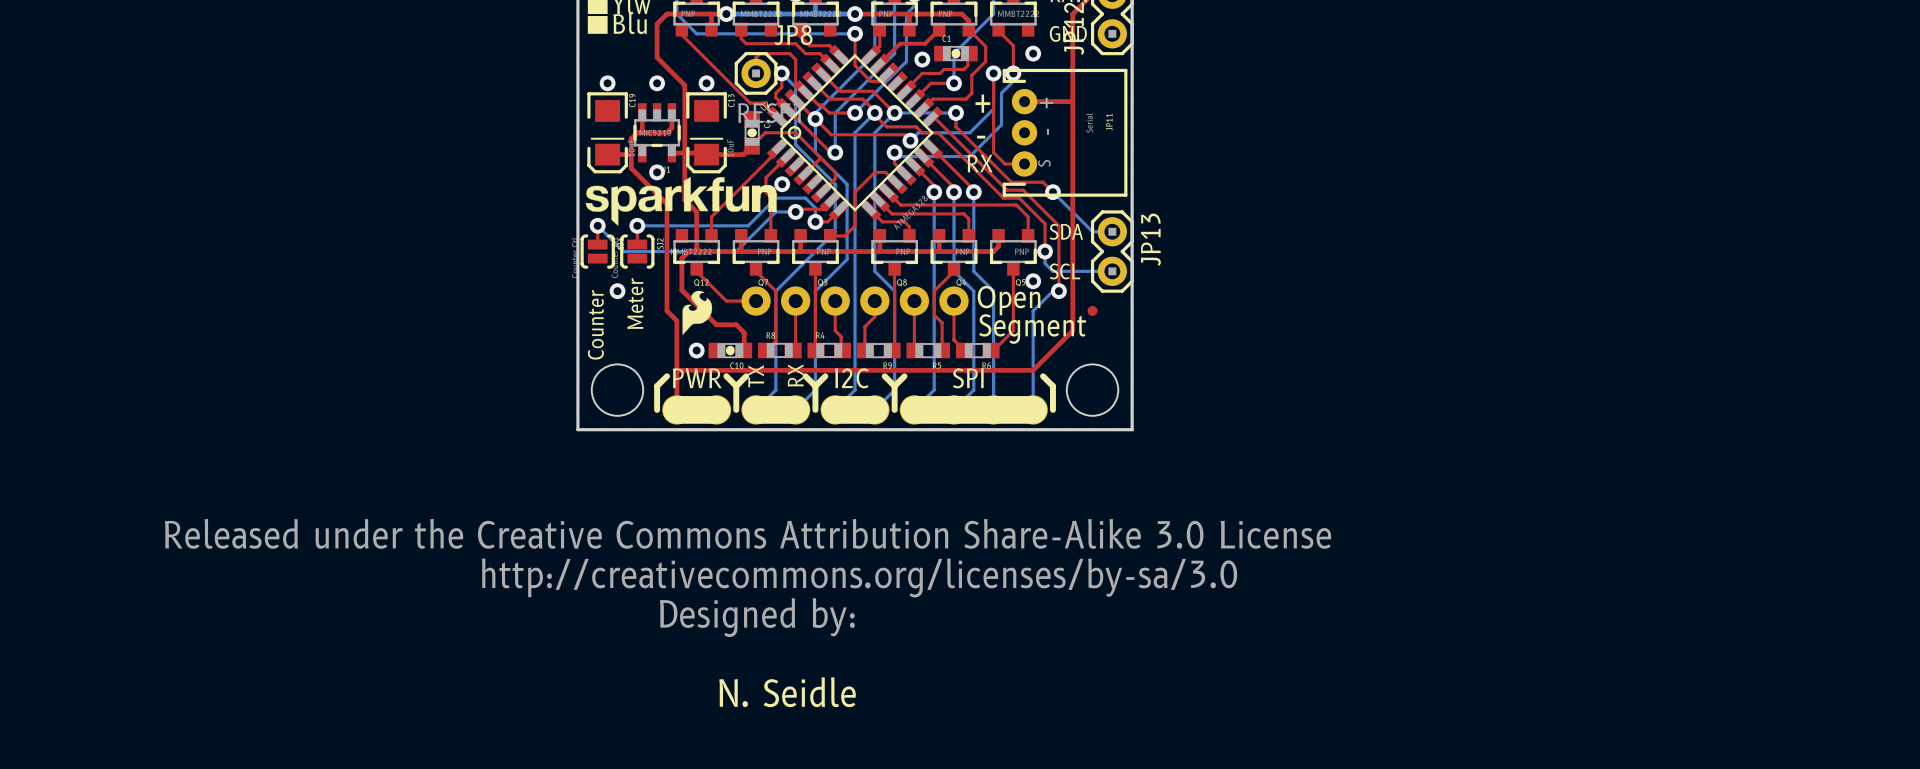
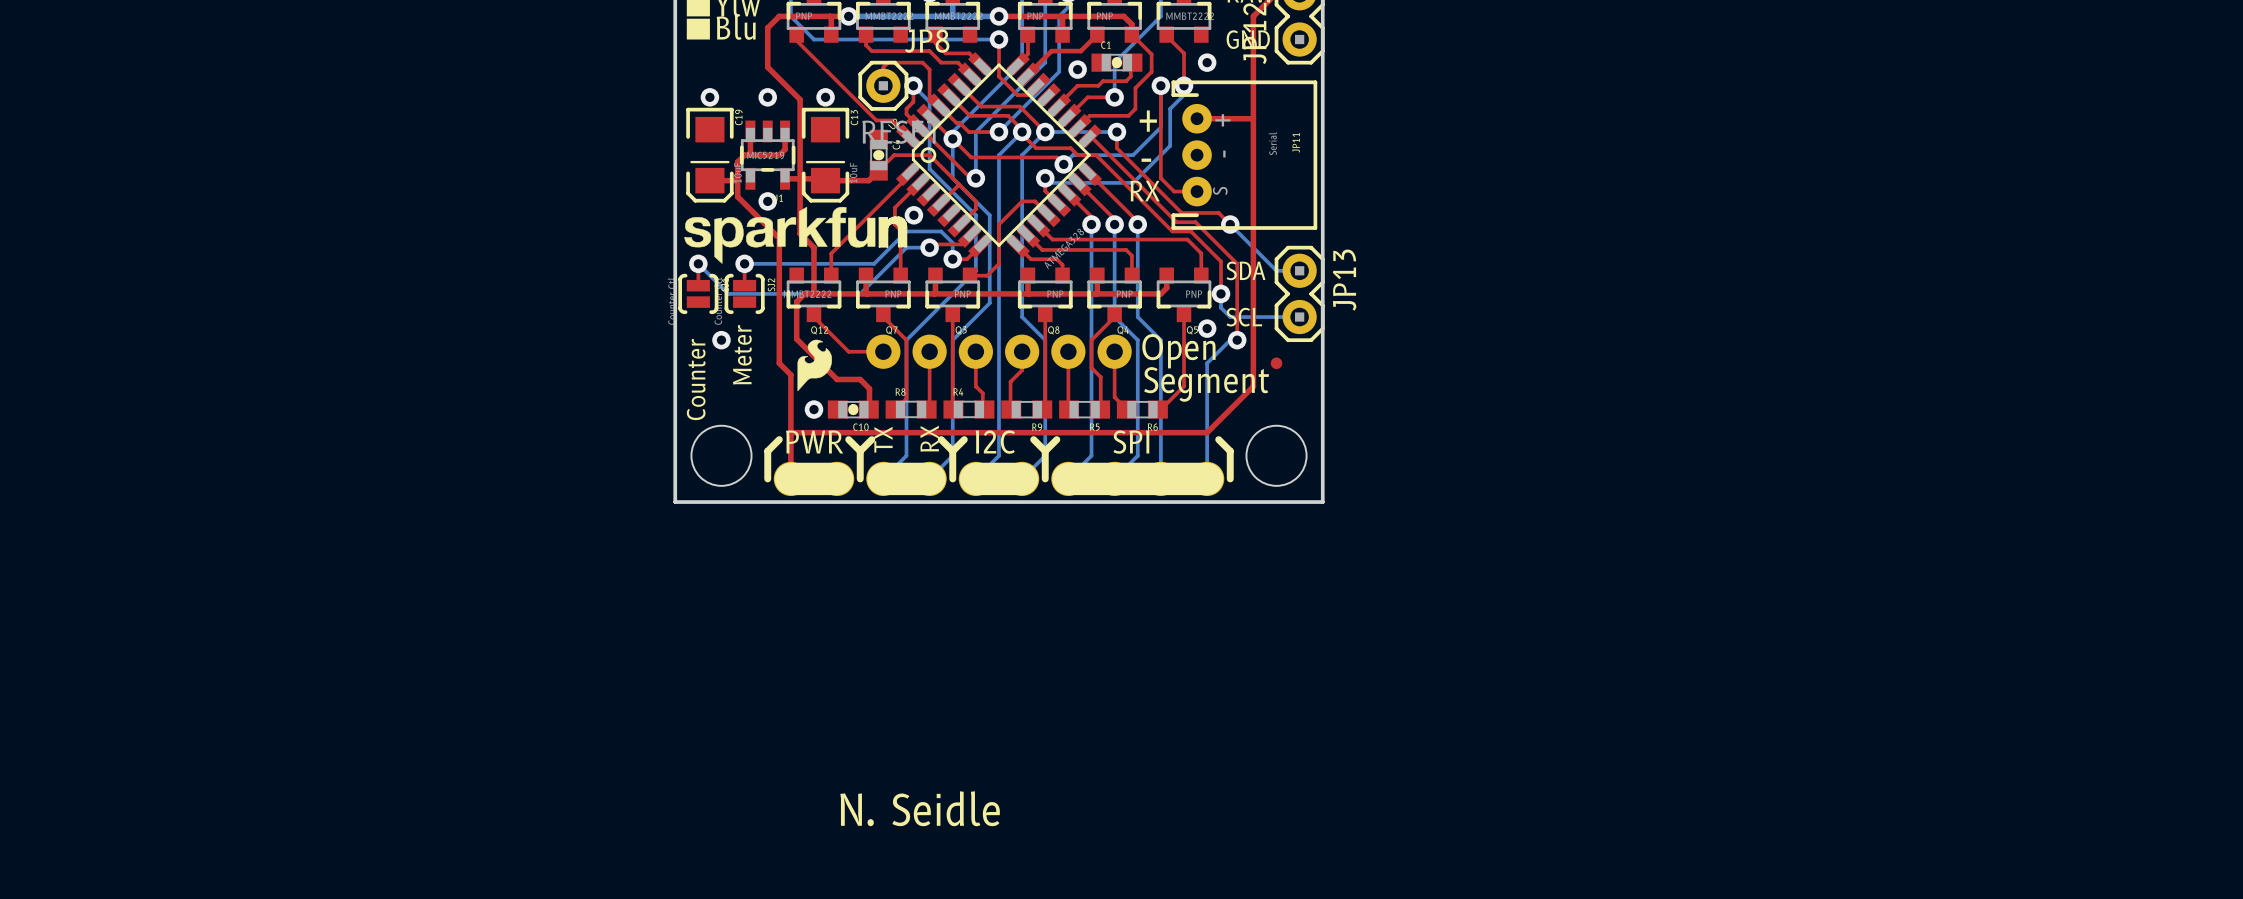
drawing: [164, 518, 1332, 638] -> none

